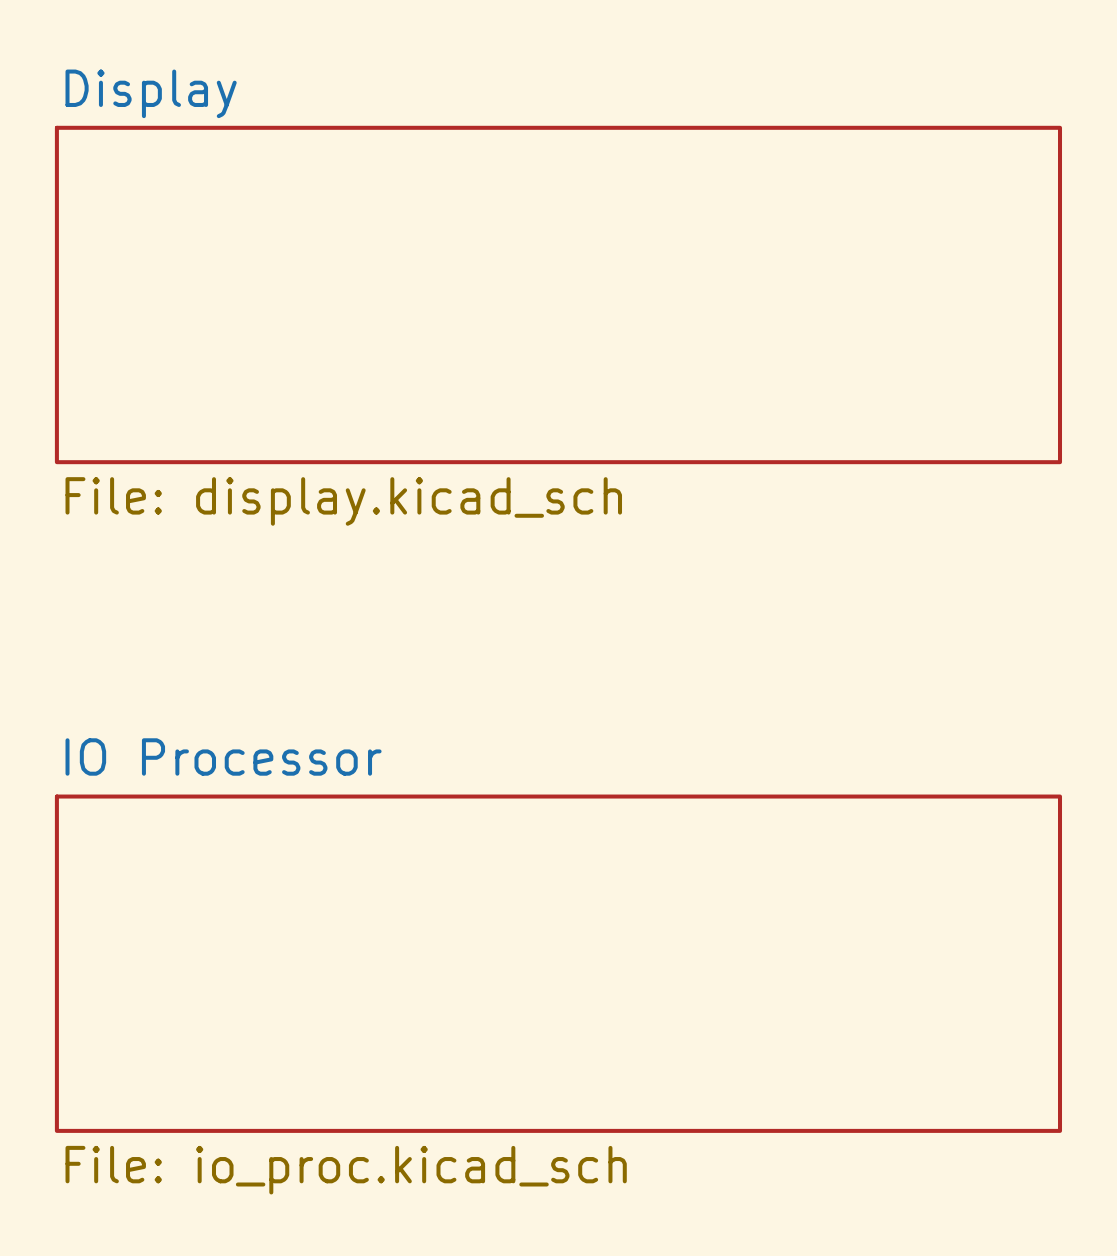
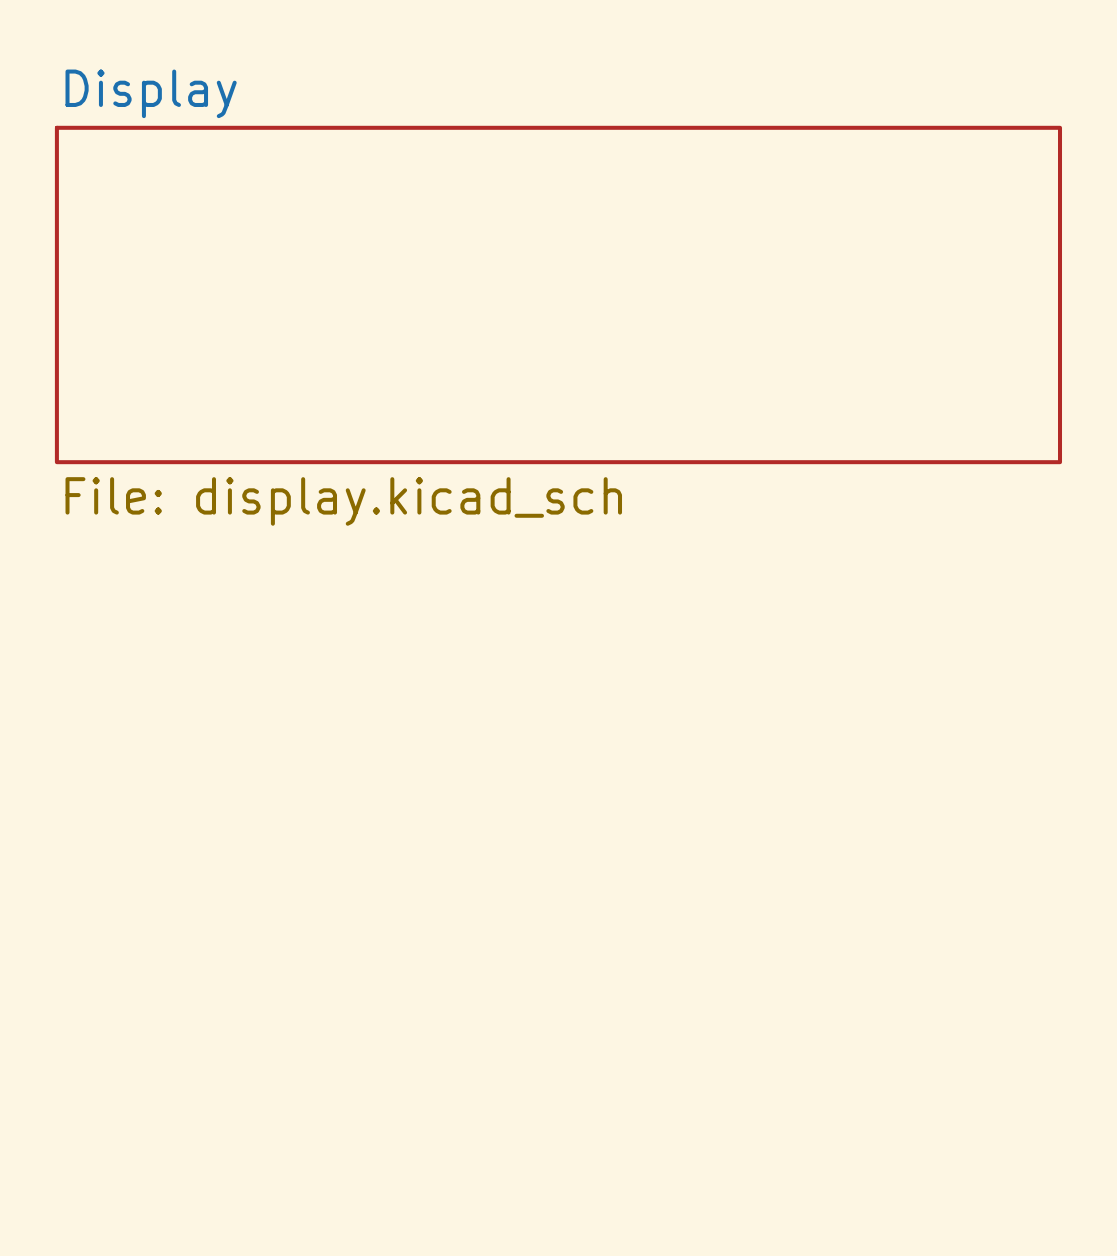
sheet IO Processor: File: io_proc.kicad_sch (558, 963) -> none

